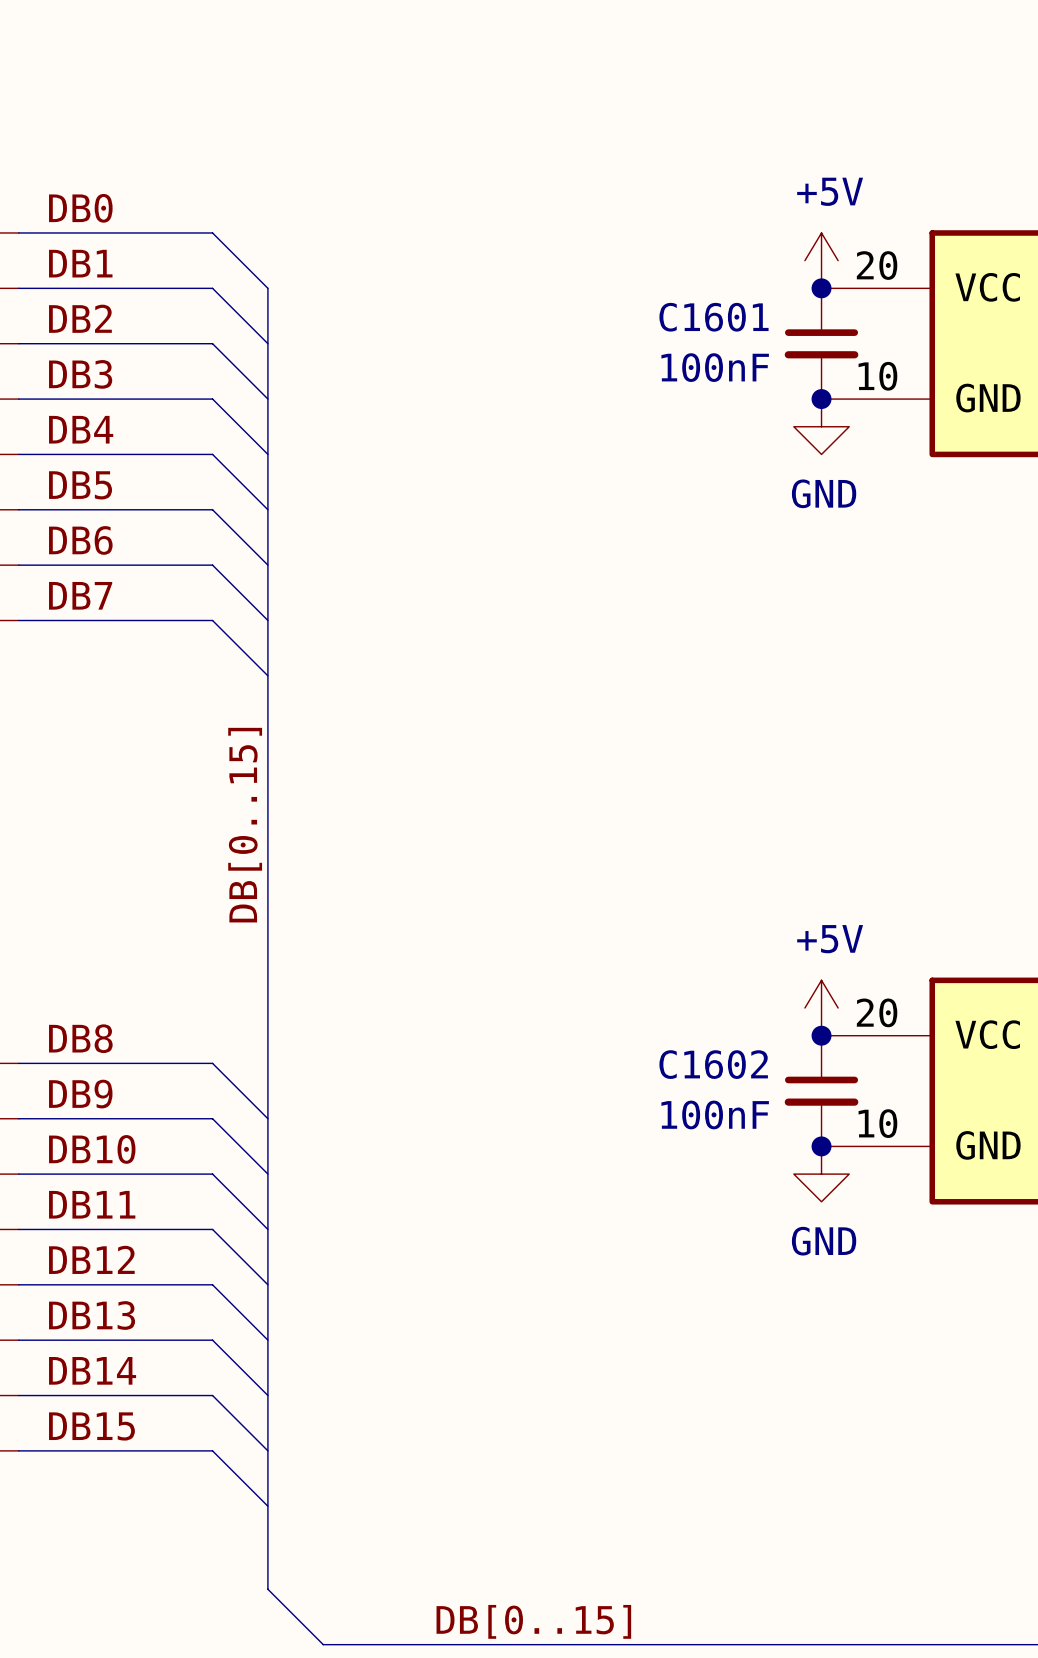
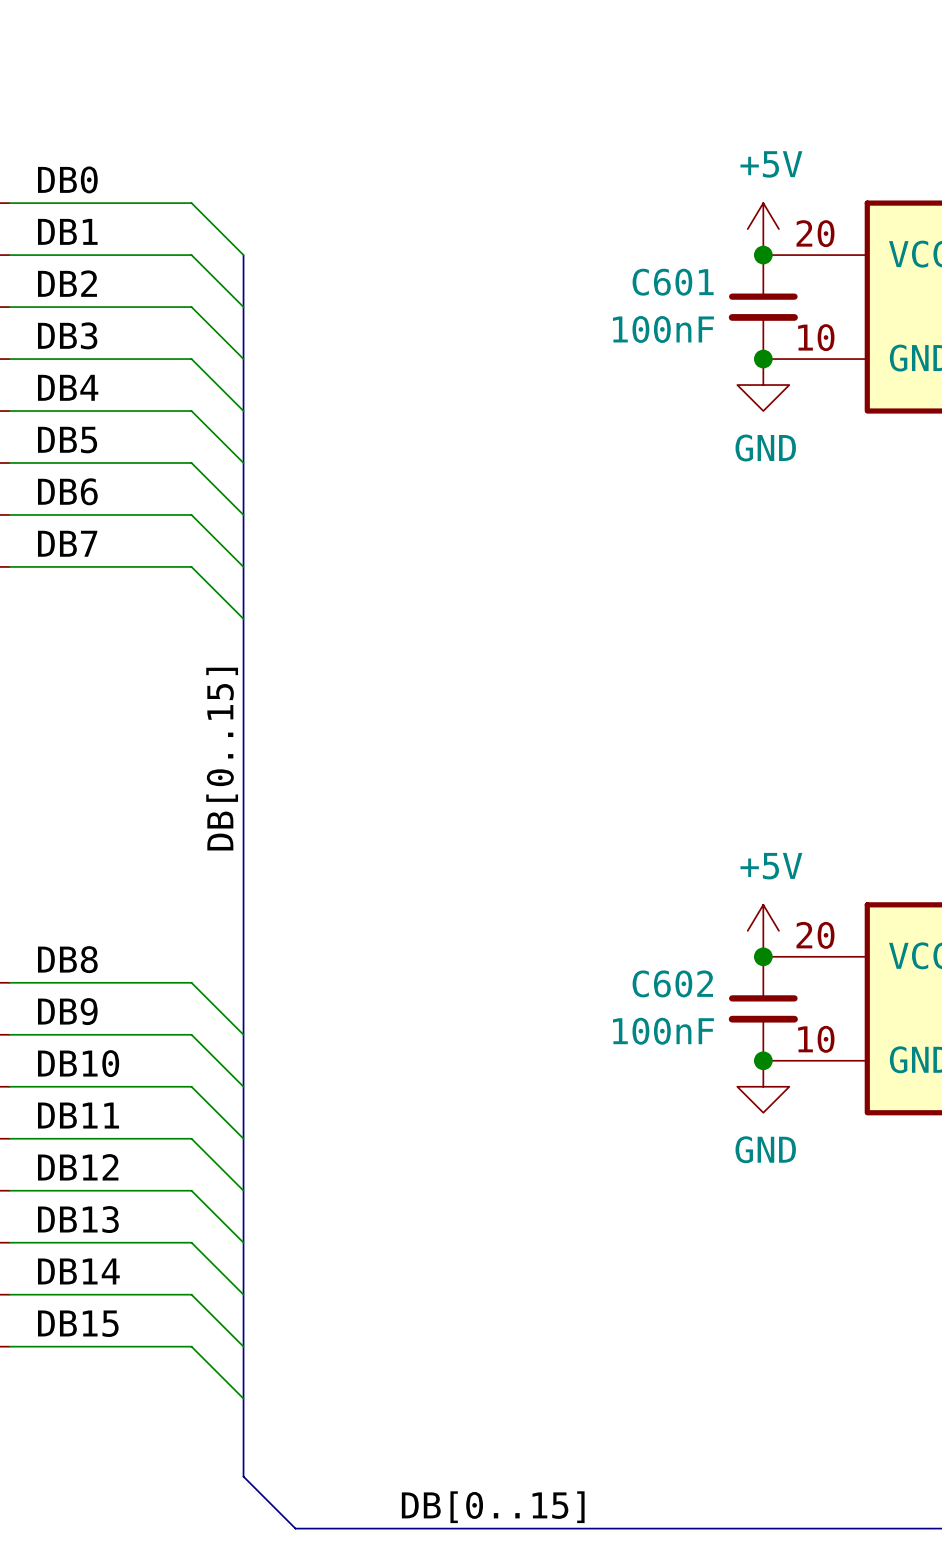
C1601 name: C1601 (714, 317) -> C601 (673, 282)
C1602 name: C1602 (713, 1064) -> C602 (672, 983)

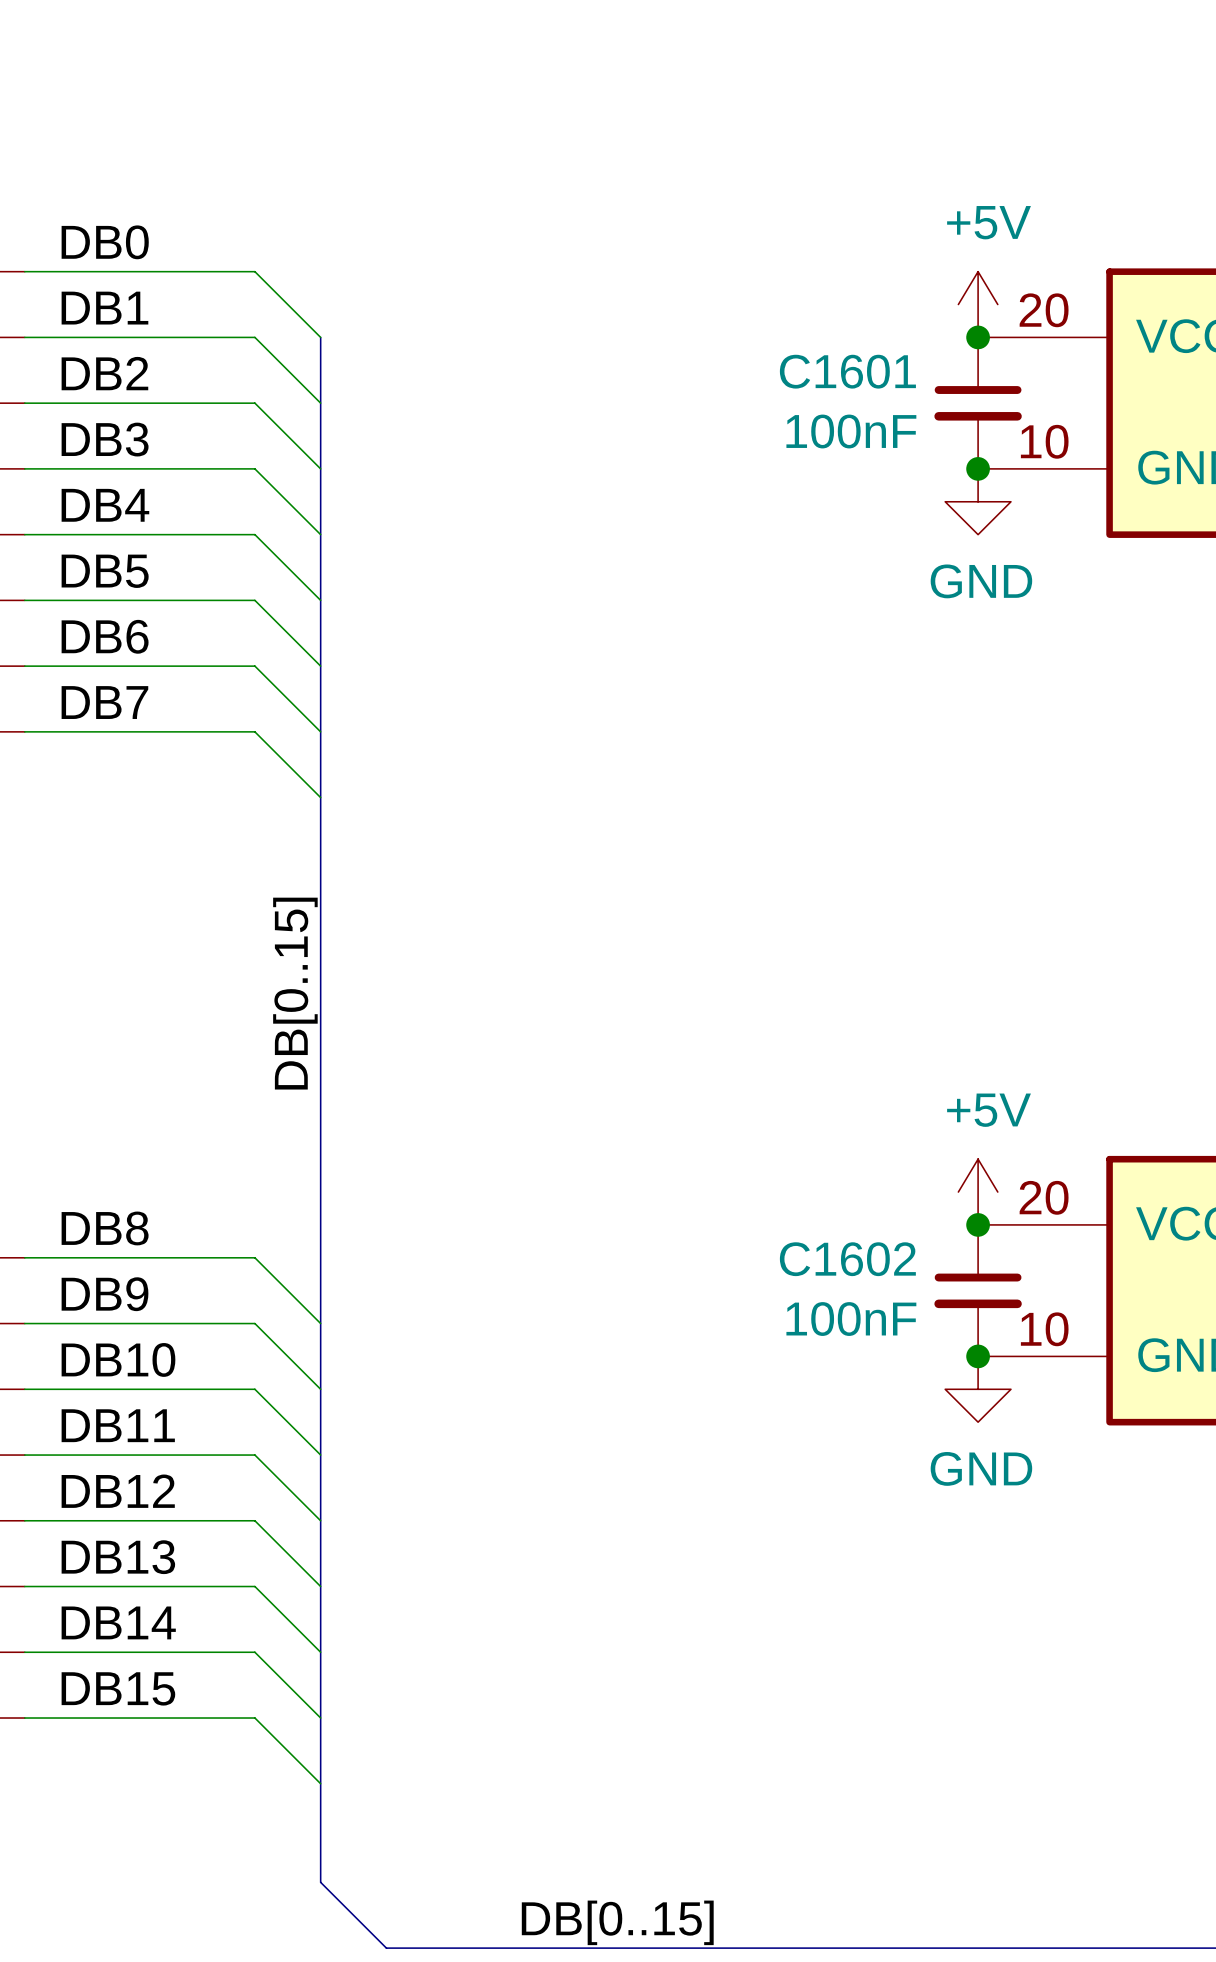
C601 name: C601 (673, 282) -> C1601 (847, 371)
C602 name: C602 (672, 983) -> C1602 (847, 1259)

